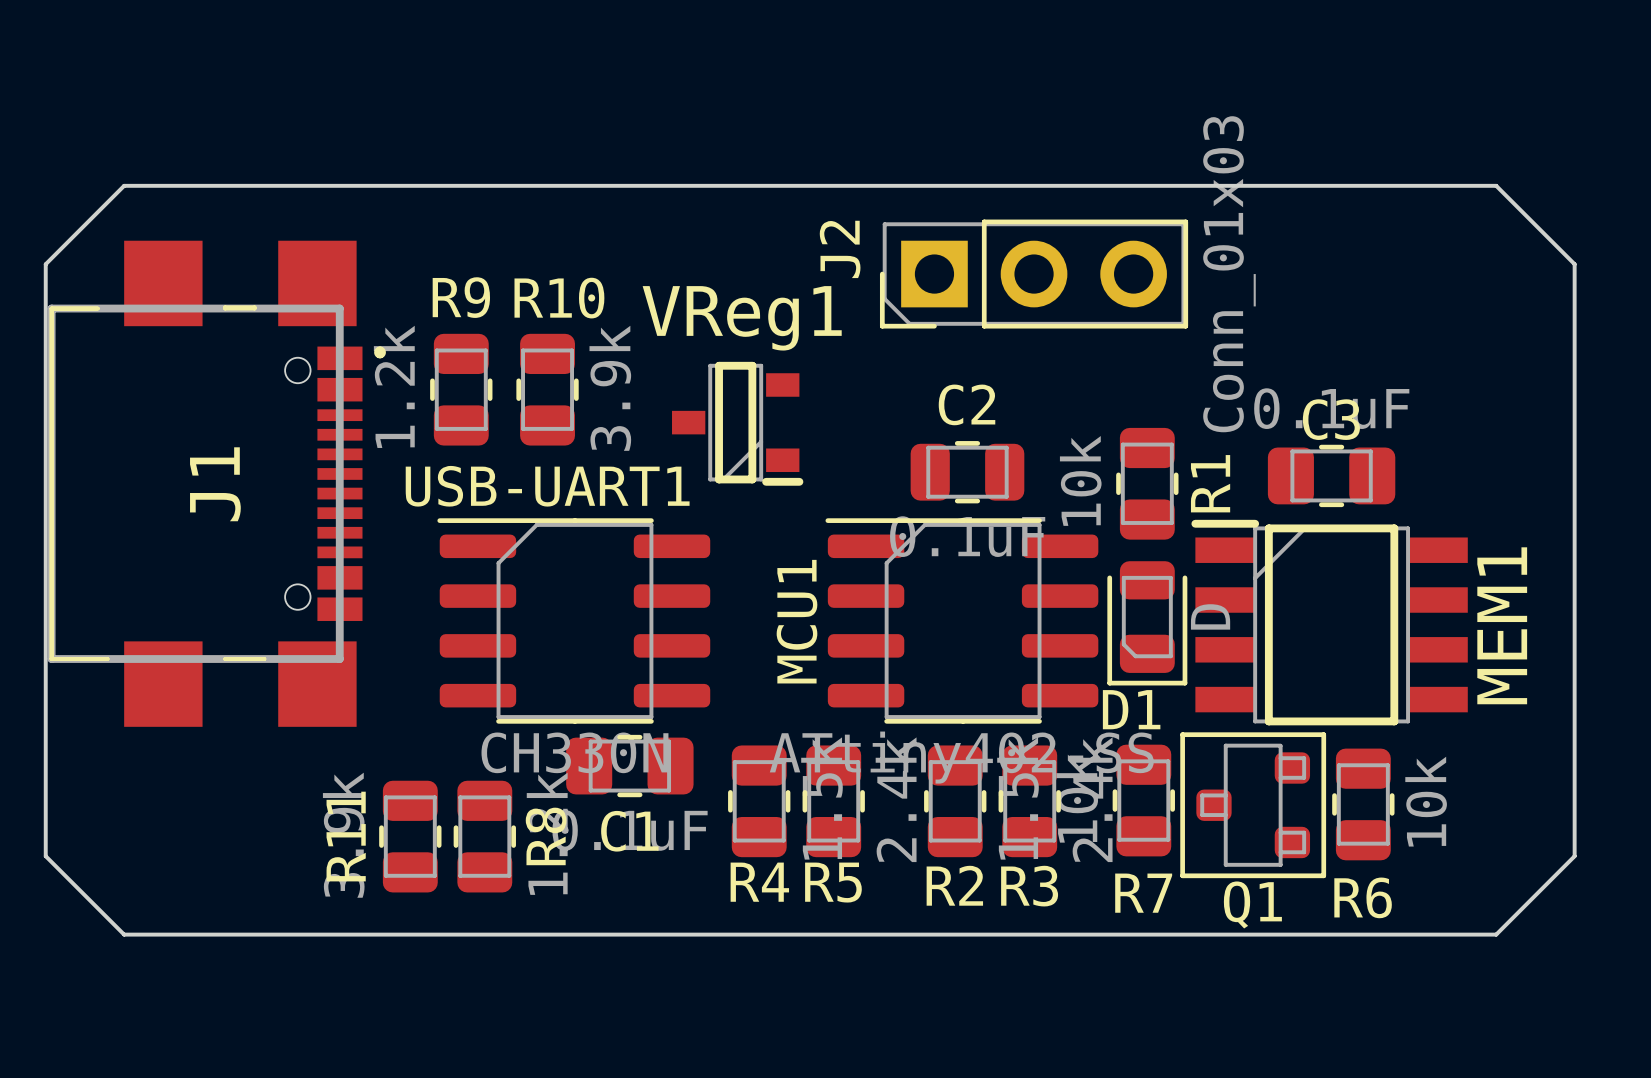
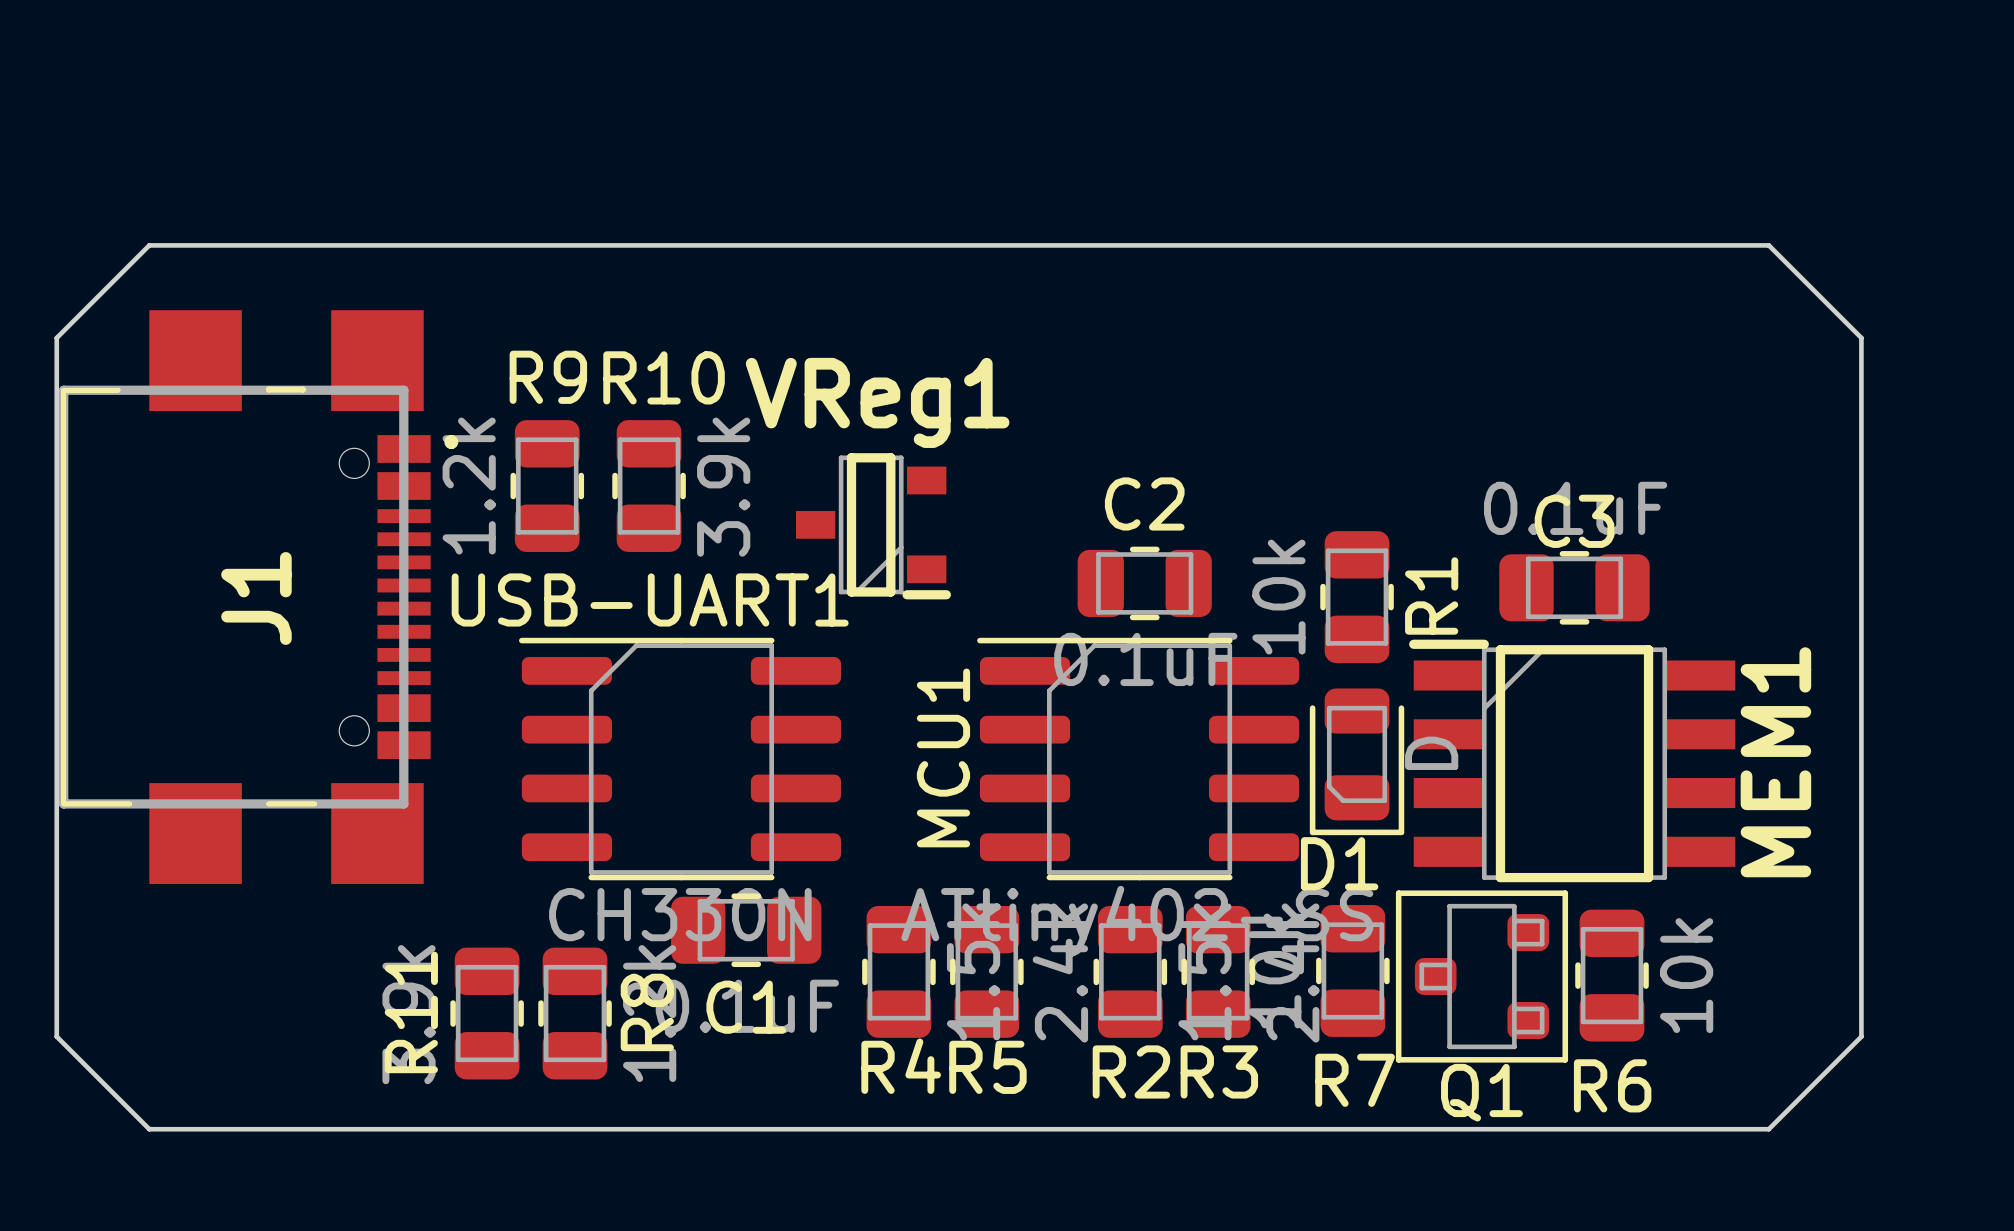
J2: Conn_01x03 (1034, 274) -> none

